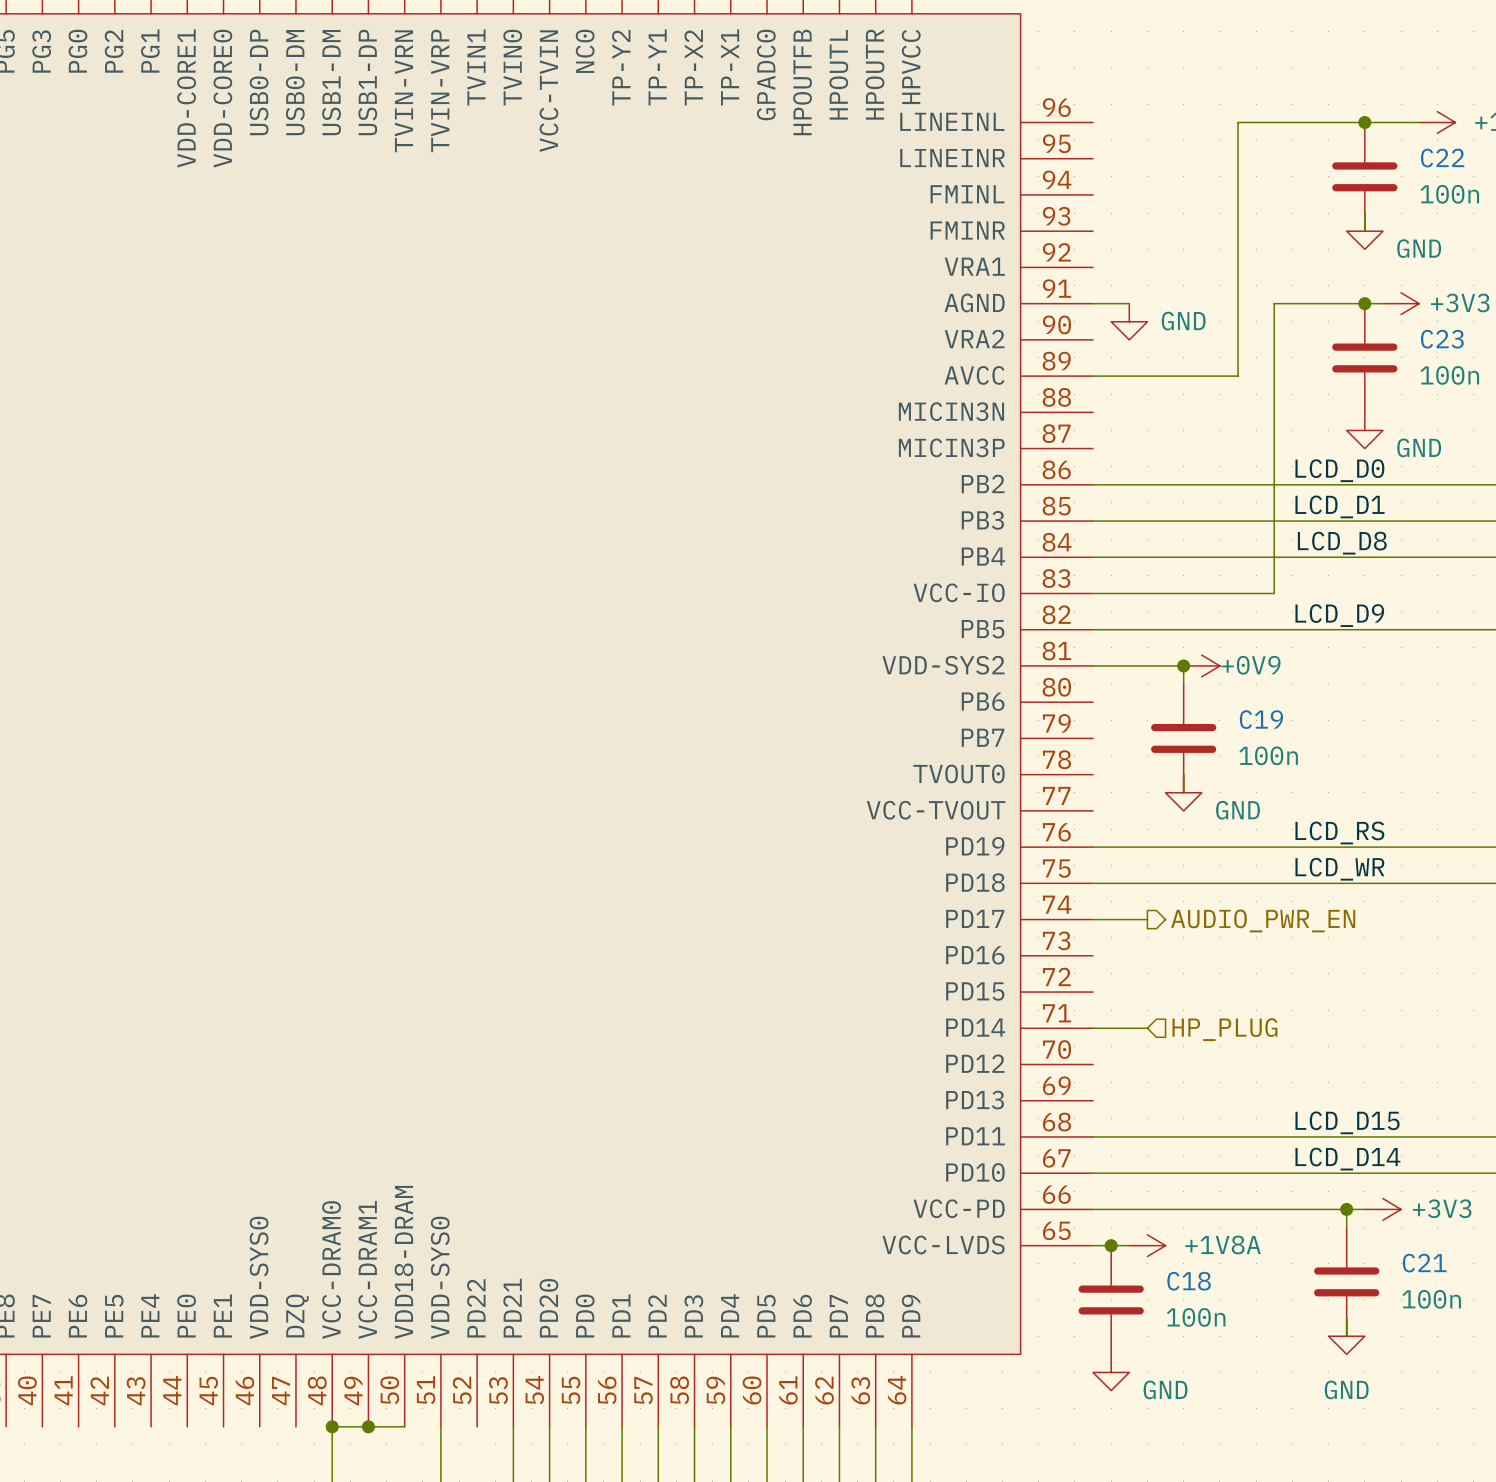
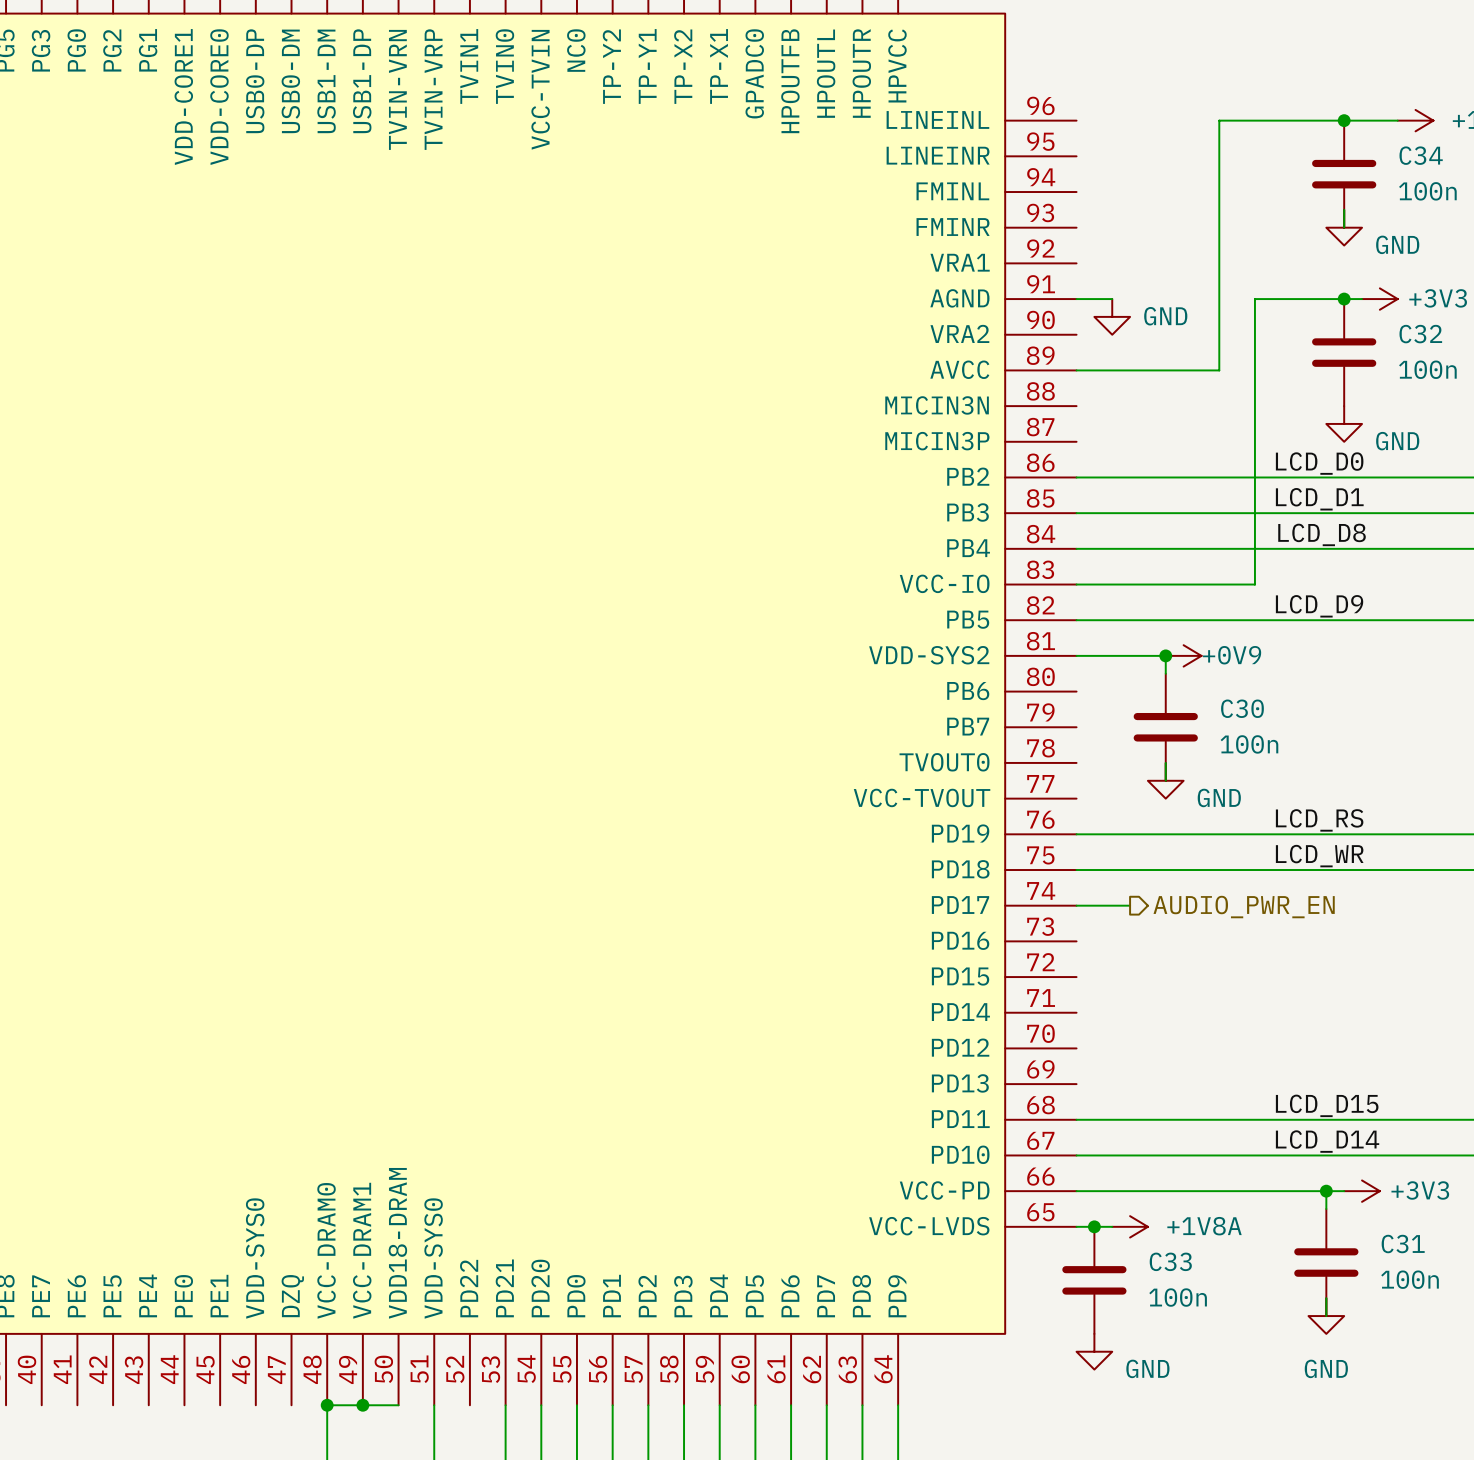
C22 name: C22 (1442, 158) -> C34 (1421, 155)
C23 name: C23 (1442, 339) -> C32 (1420, 334)
C19 name: C19 (1261, 719) -> C30 (1242, 708)
wire: (1093, 1028) (1147, 1028) -> none
hierarchical label: HP_PLUG (1224, 1029) -> none
C21 name: C21 (1424, 1263) -> C31 (1403, 1244)
C18 name: C18 (1189, 1281) -> C33 (1170, 1261)

